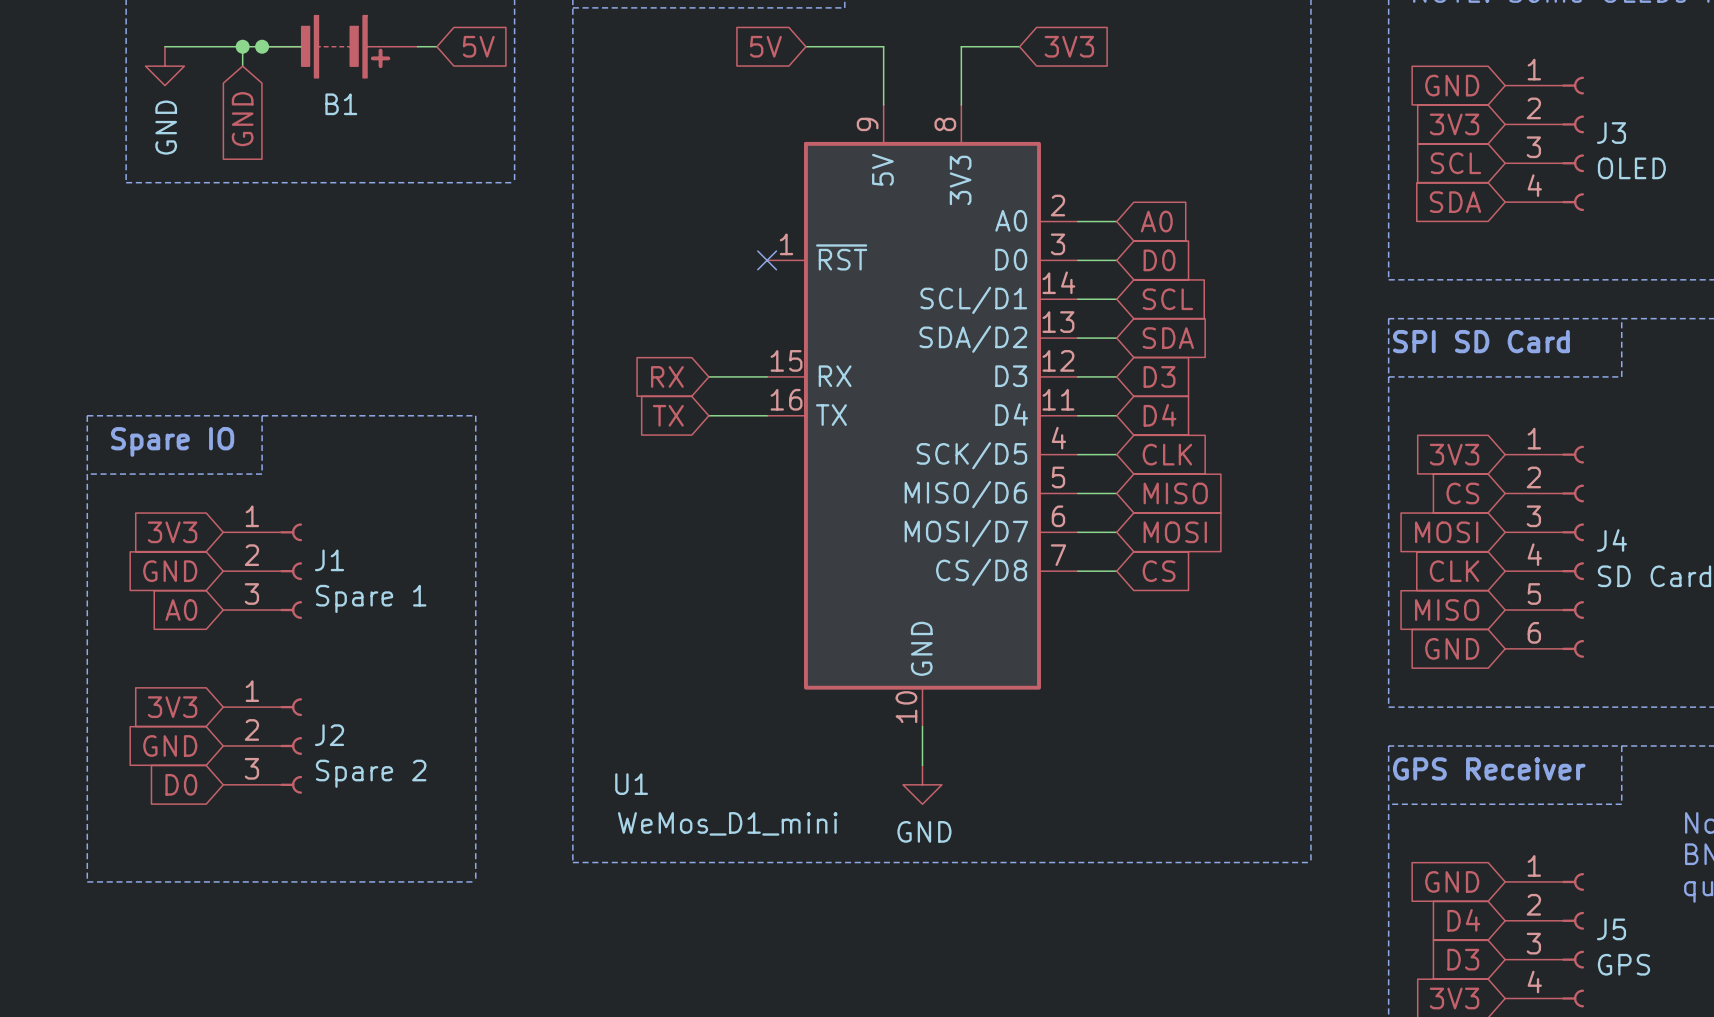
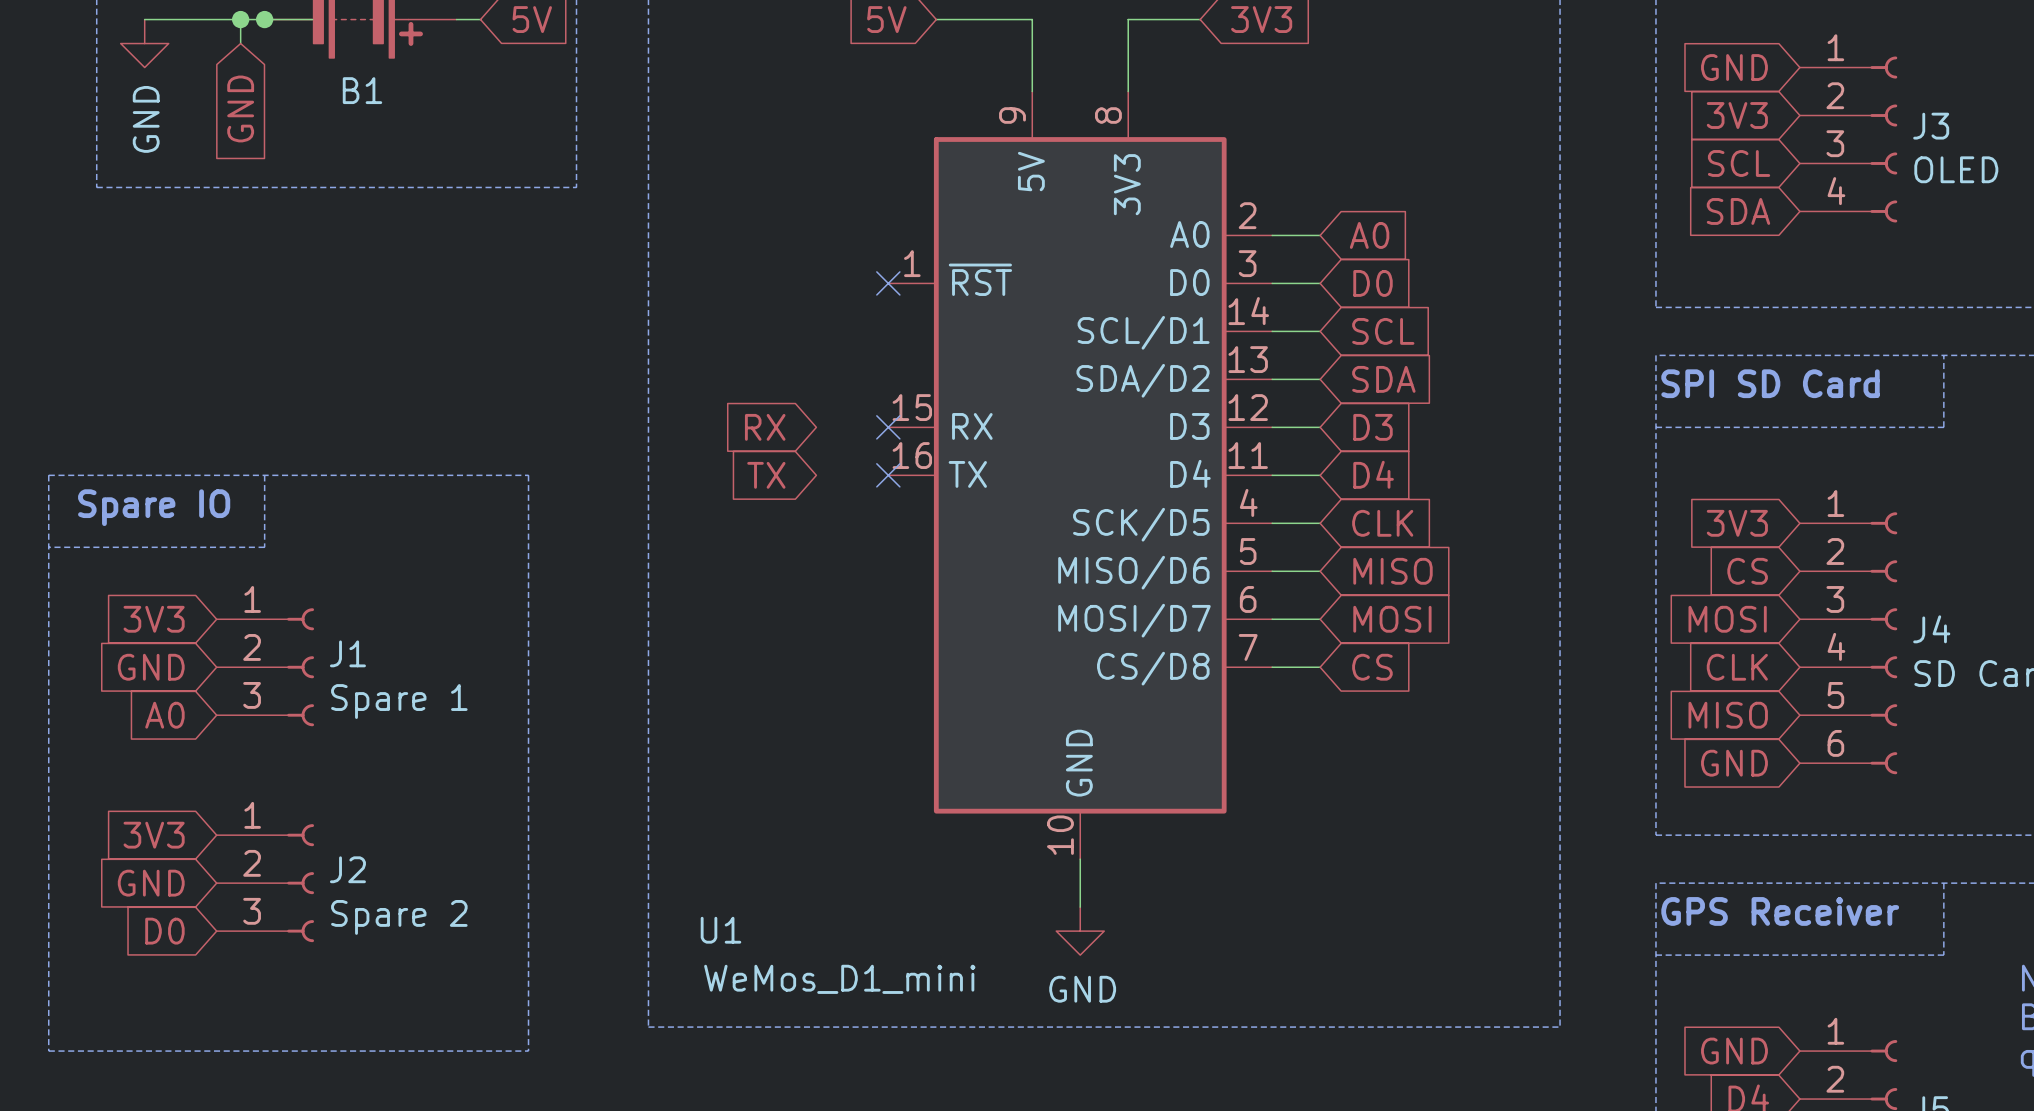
wire: (708, 376) (767, 376) -> none
no-connect mark: none -> (888, 427)
wire: (708, 415) (767, 415) -> none
no-connect mark: none -> (888, 475)

